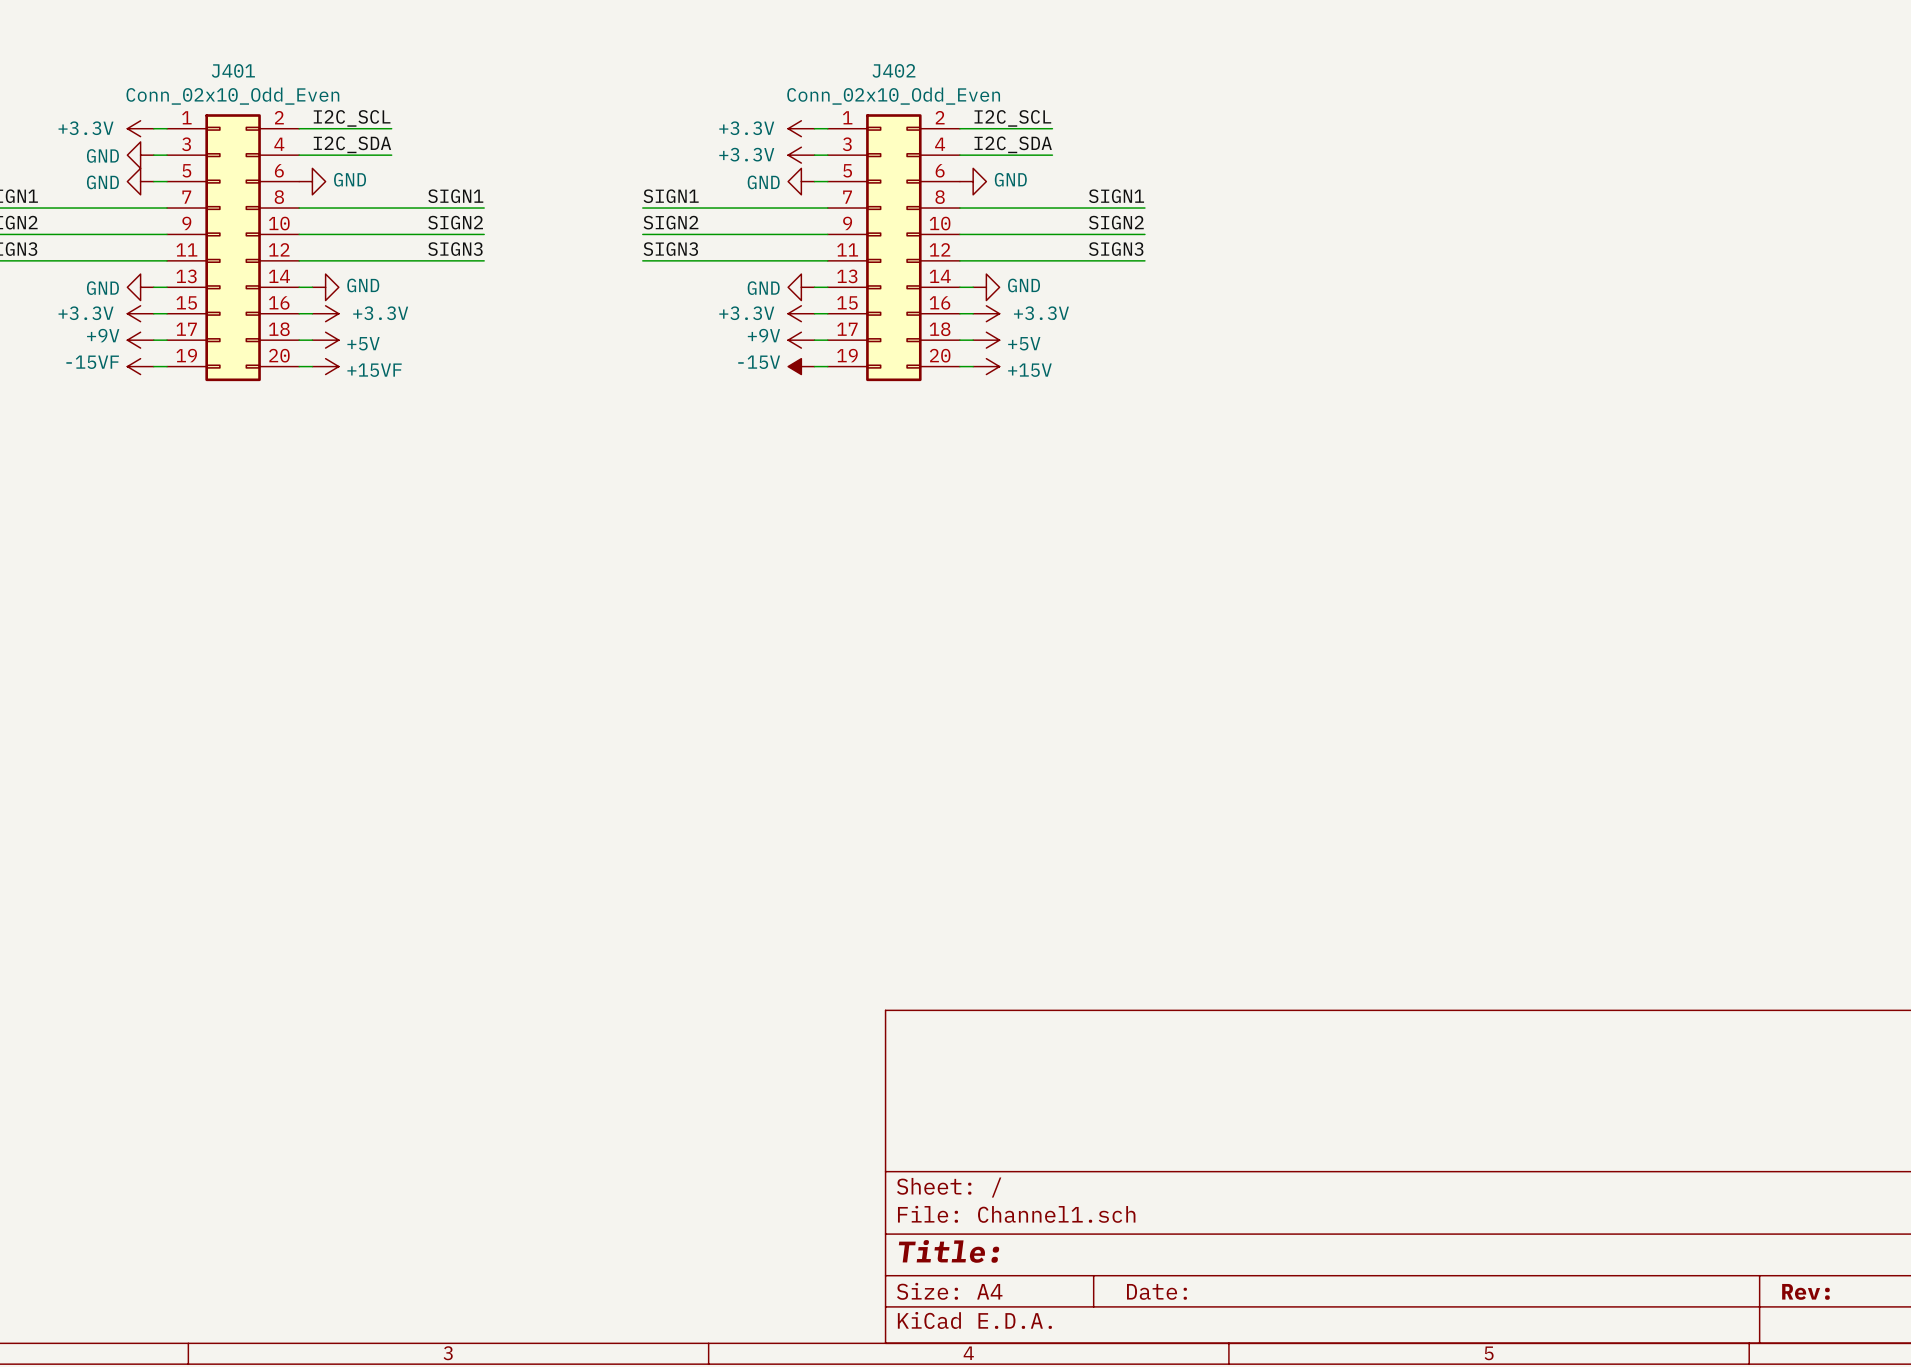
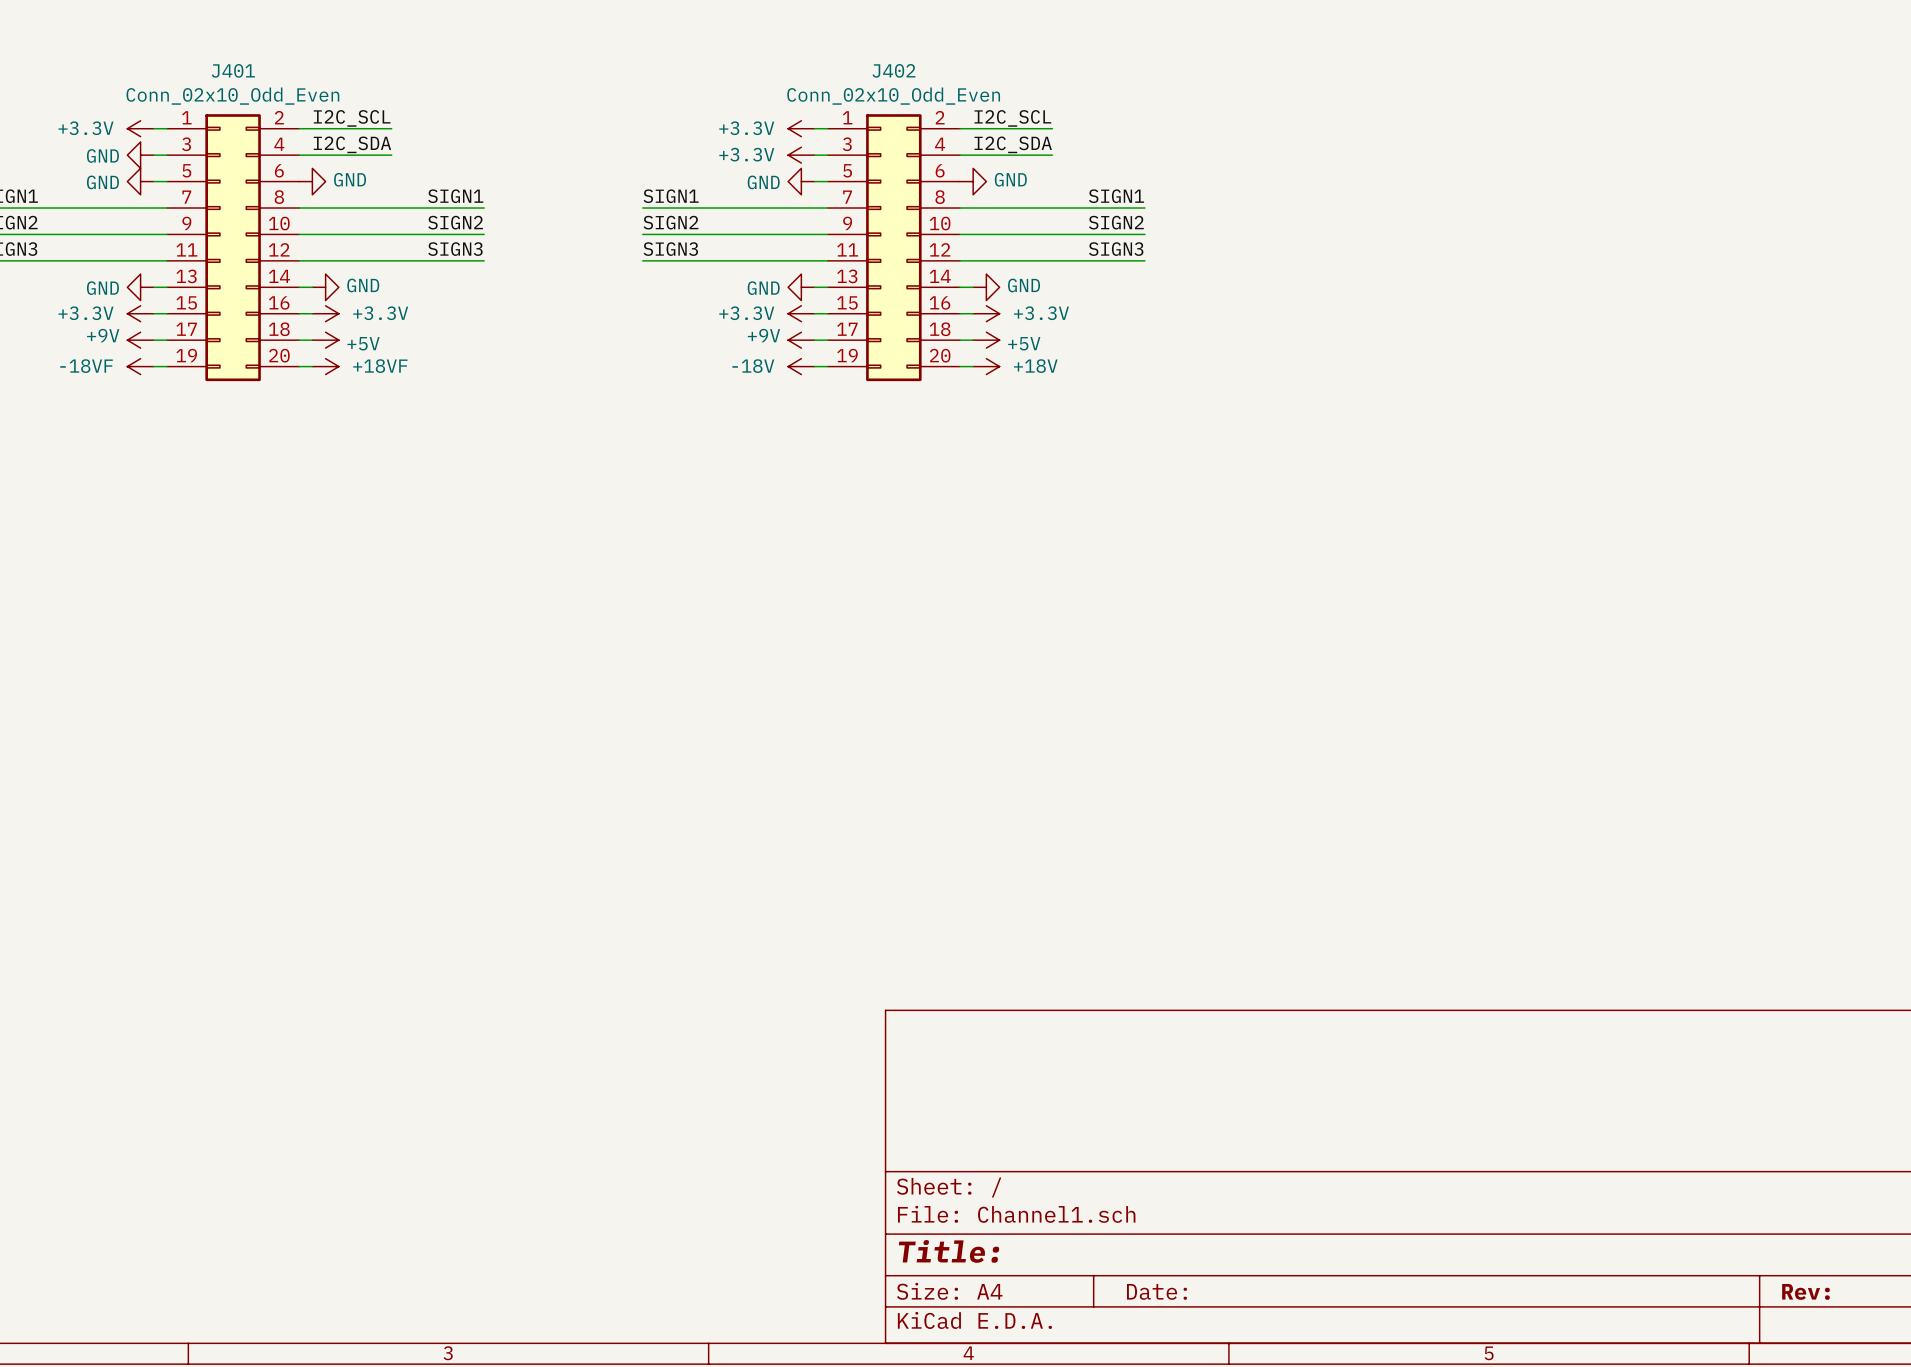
power symbol: -15VF (140, 366) -> -18VF (140, 366)
power symbol: +15VF (325, 366) -> +18VF (325, 366)
power symbol: -15V (801, 366) -> -18V (801, 366)
power symbol: +15V (986, 366) -> +18V (986, 366)

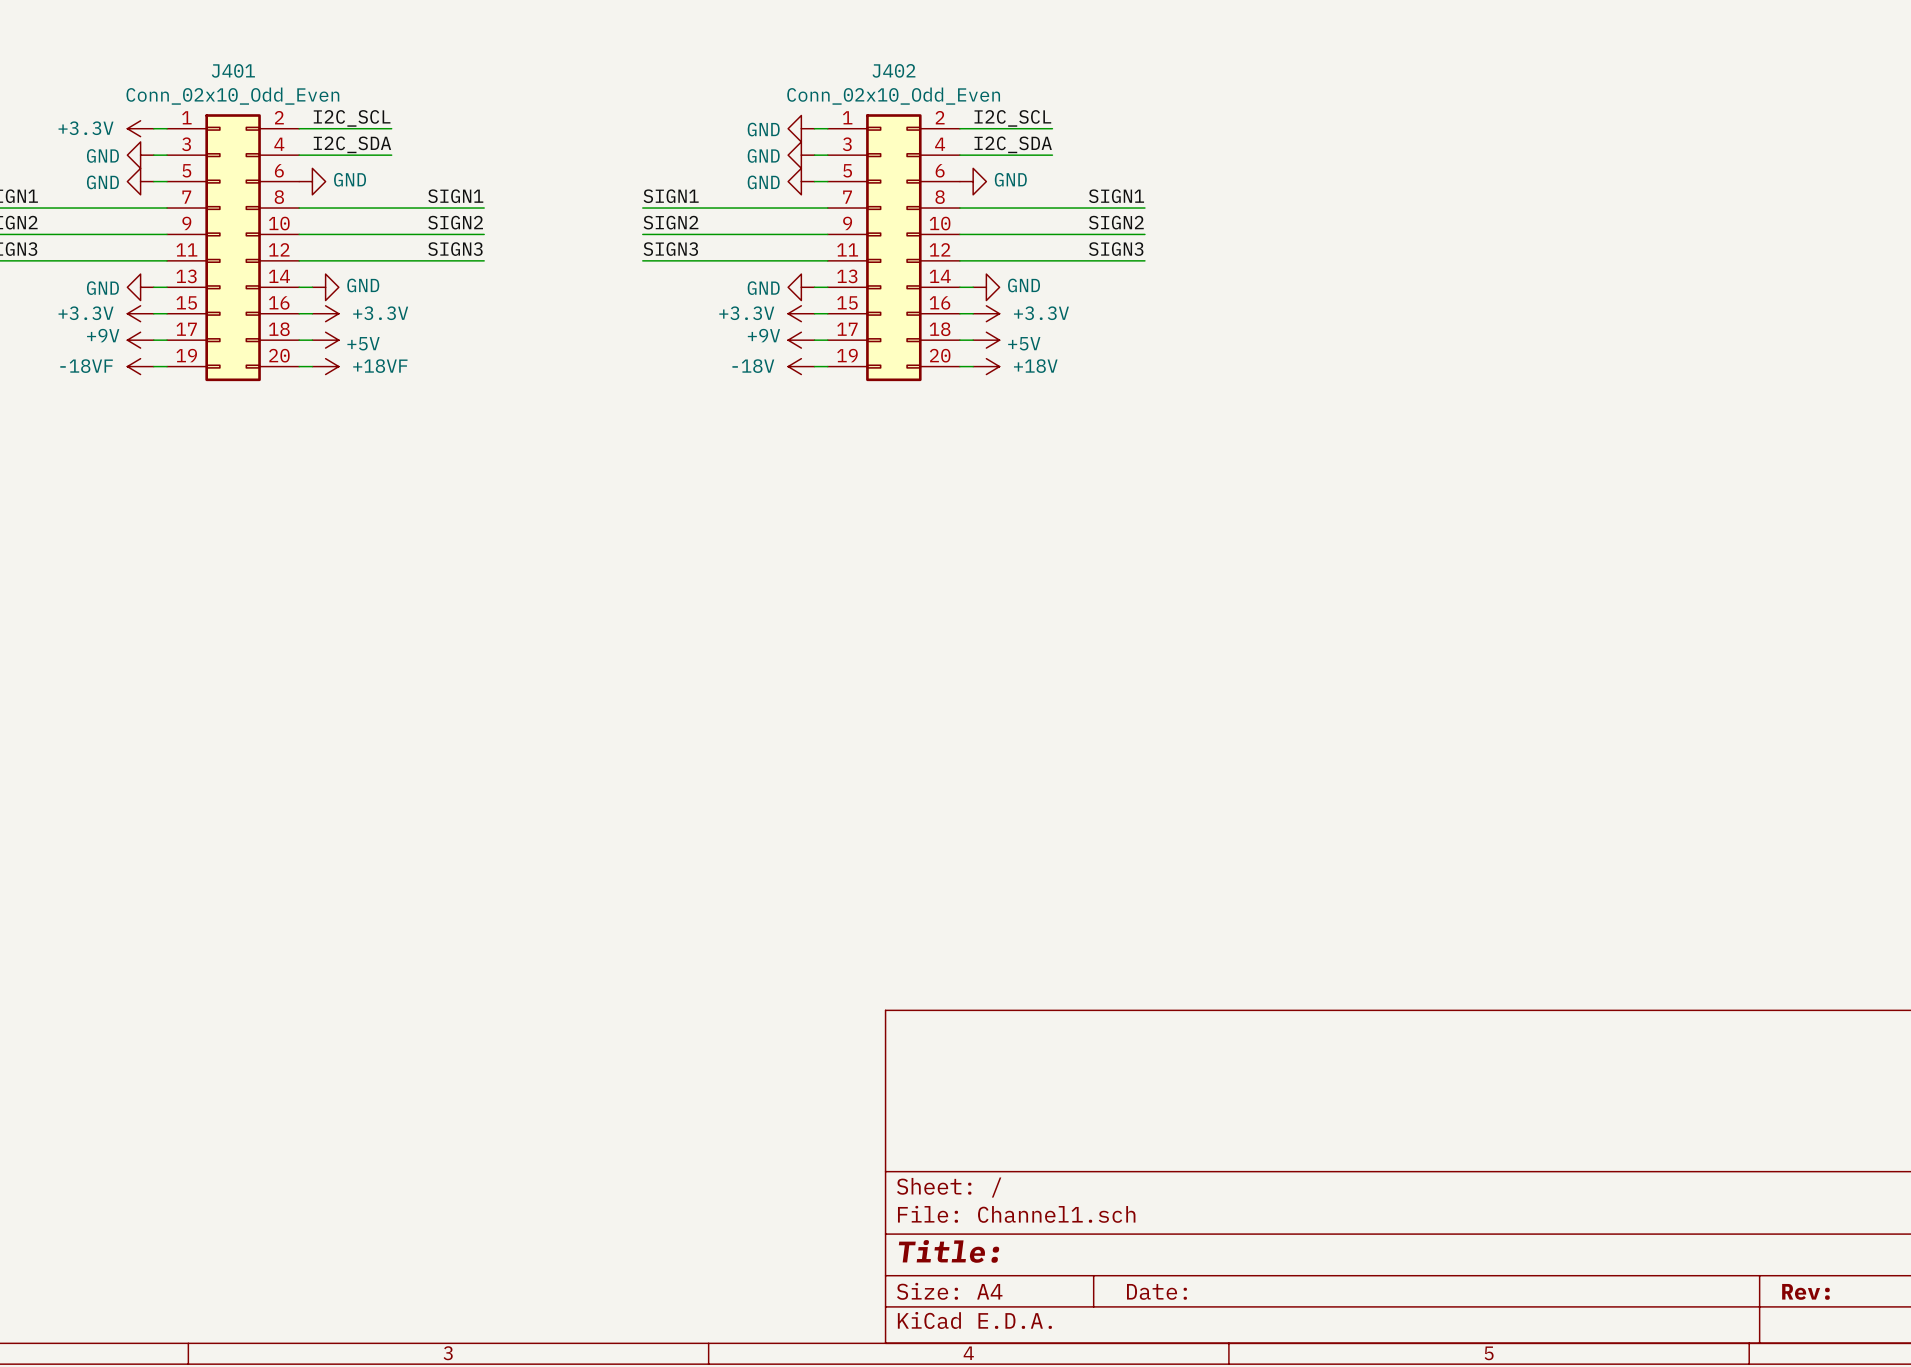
power symbol: +3.3V (801, 128) -> GND (801, 128)
power symbol: +3.3V (801, 155) -> GND (801, 155)

